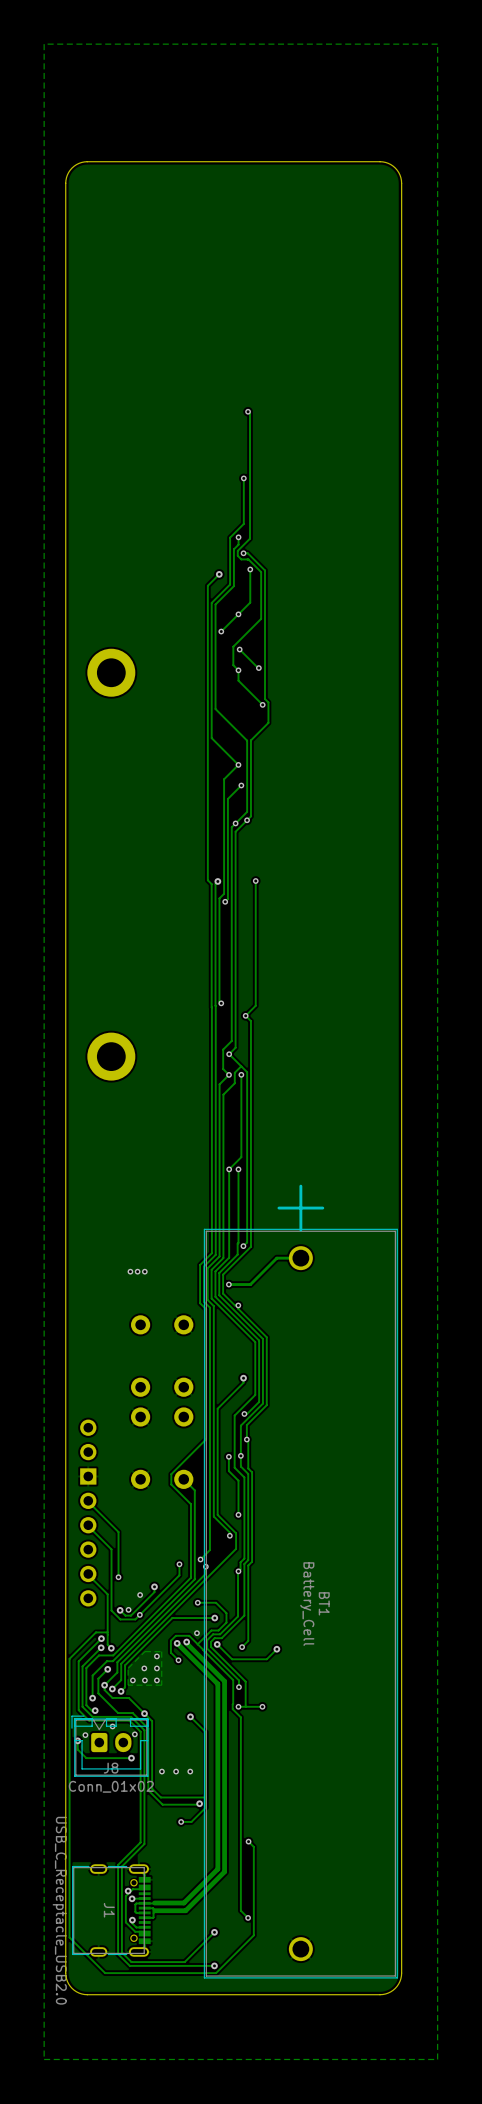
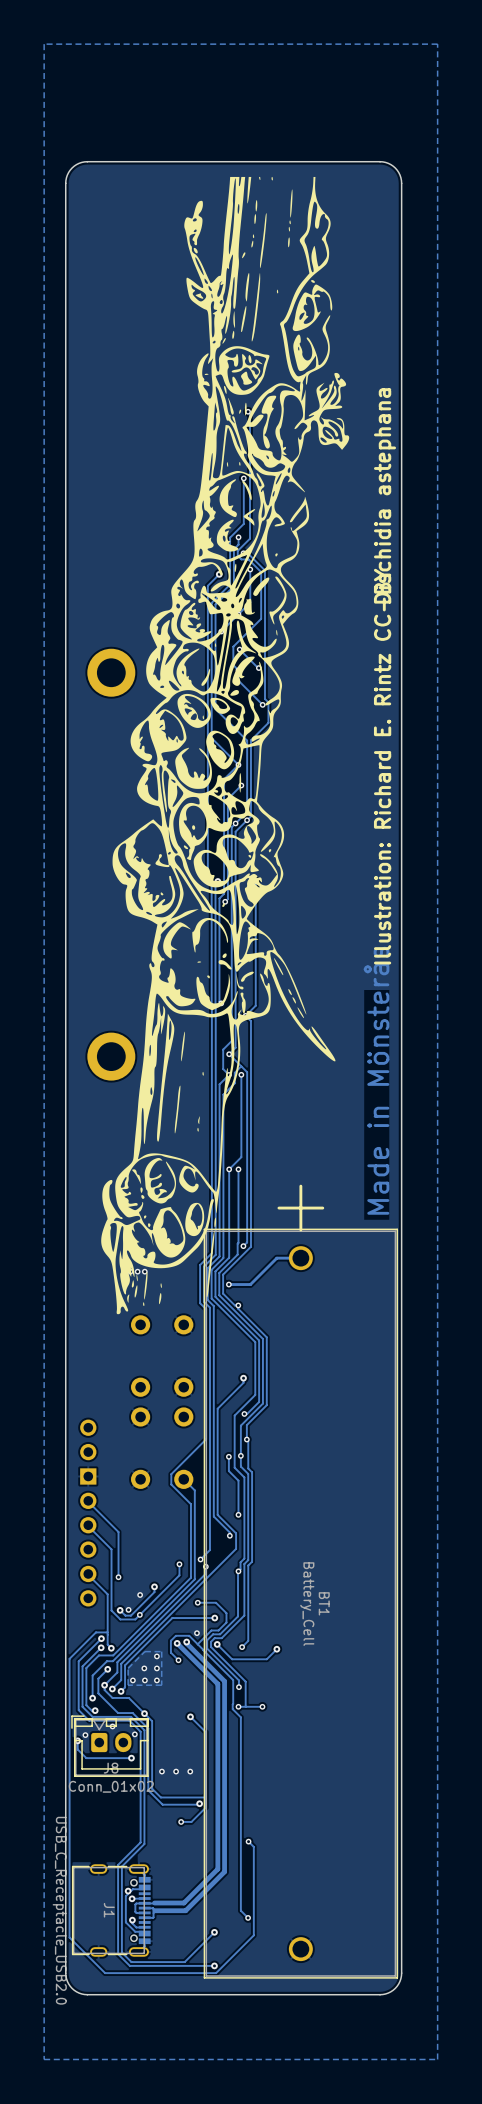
drawing: none -> [101, 176, 350, 1315]
text: none -> Dischidia astephana (384, 495)
text: none -> Illustration: Richard E. Rintz CC-BY (382, 766)
text: none -> Made in Mönsterås (376, 1080)

